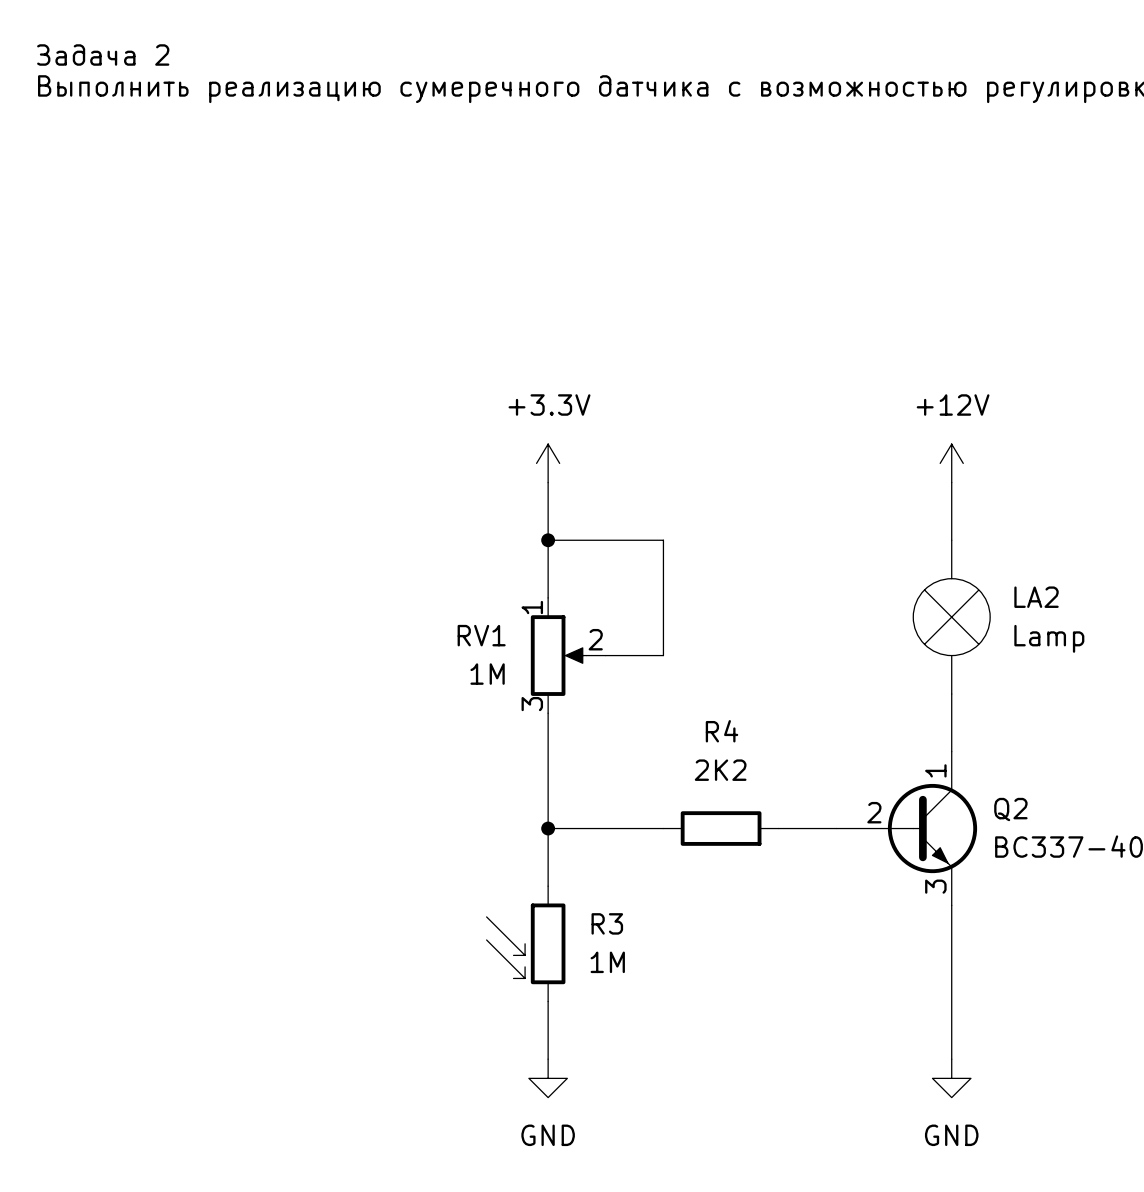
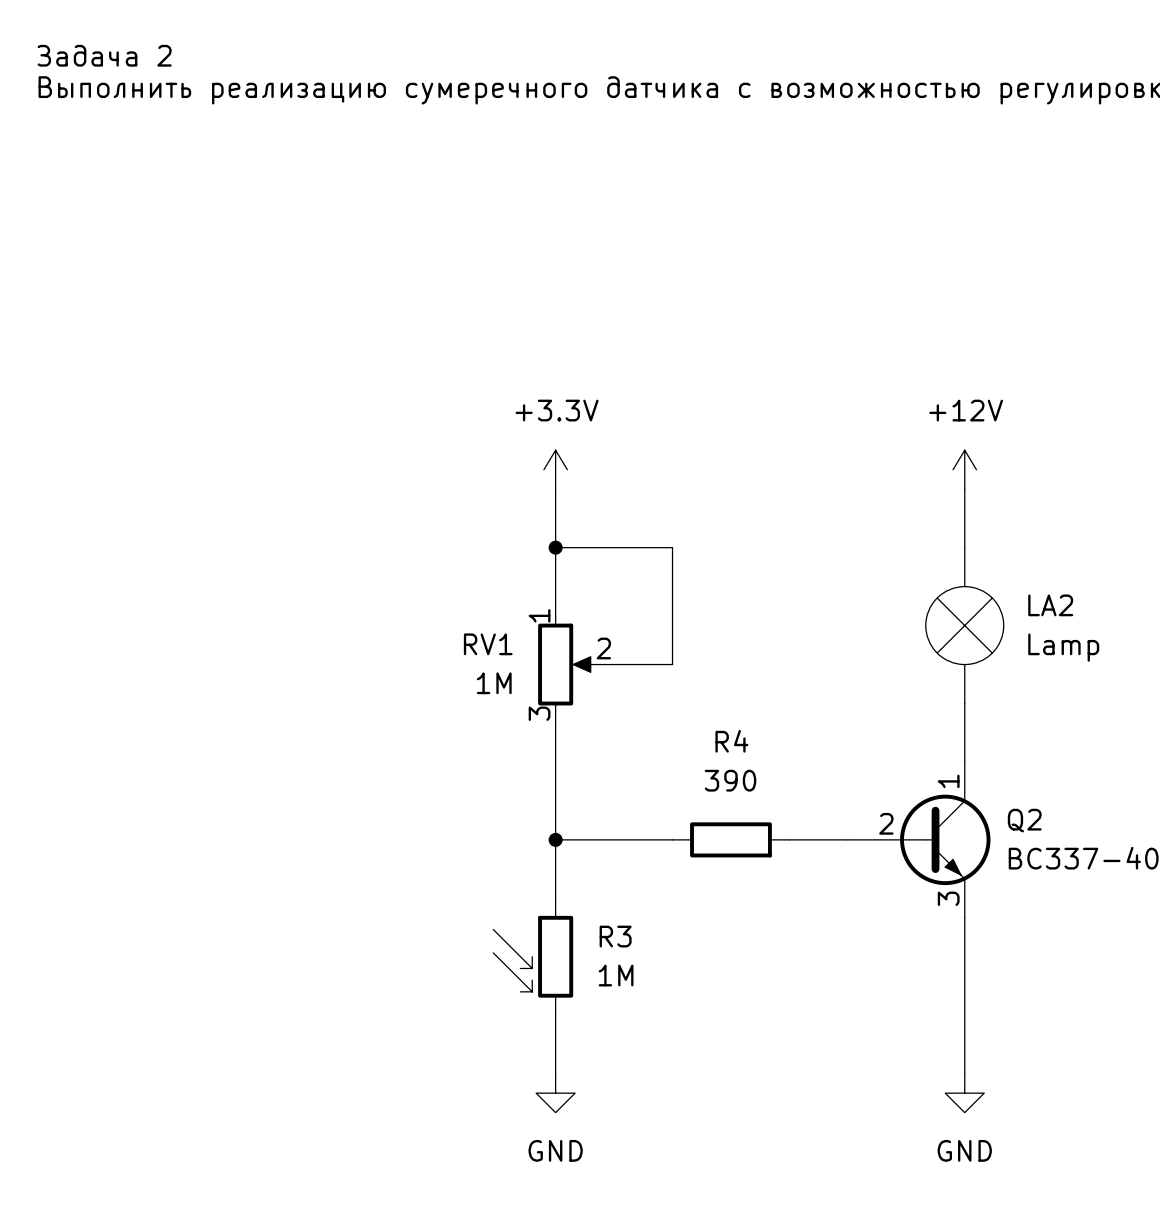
R4 value: 2K2 (720, 770) -> 390 (730, 780)

